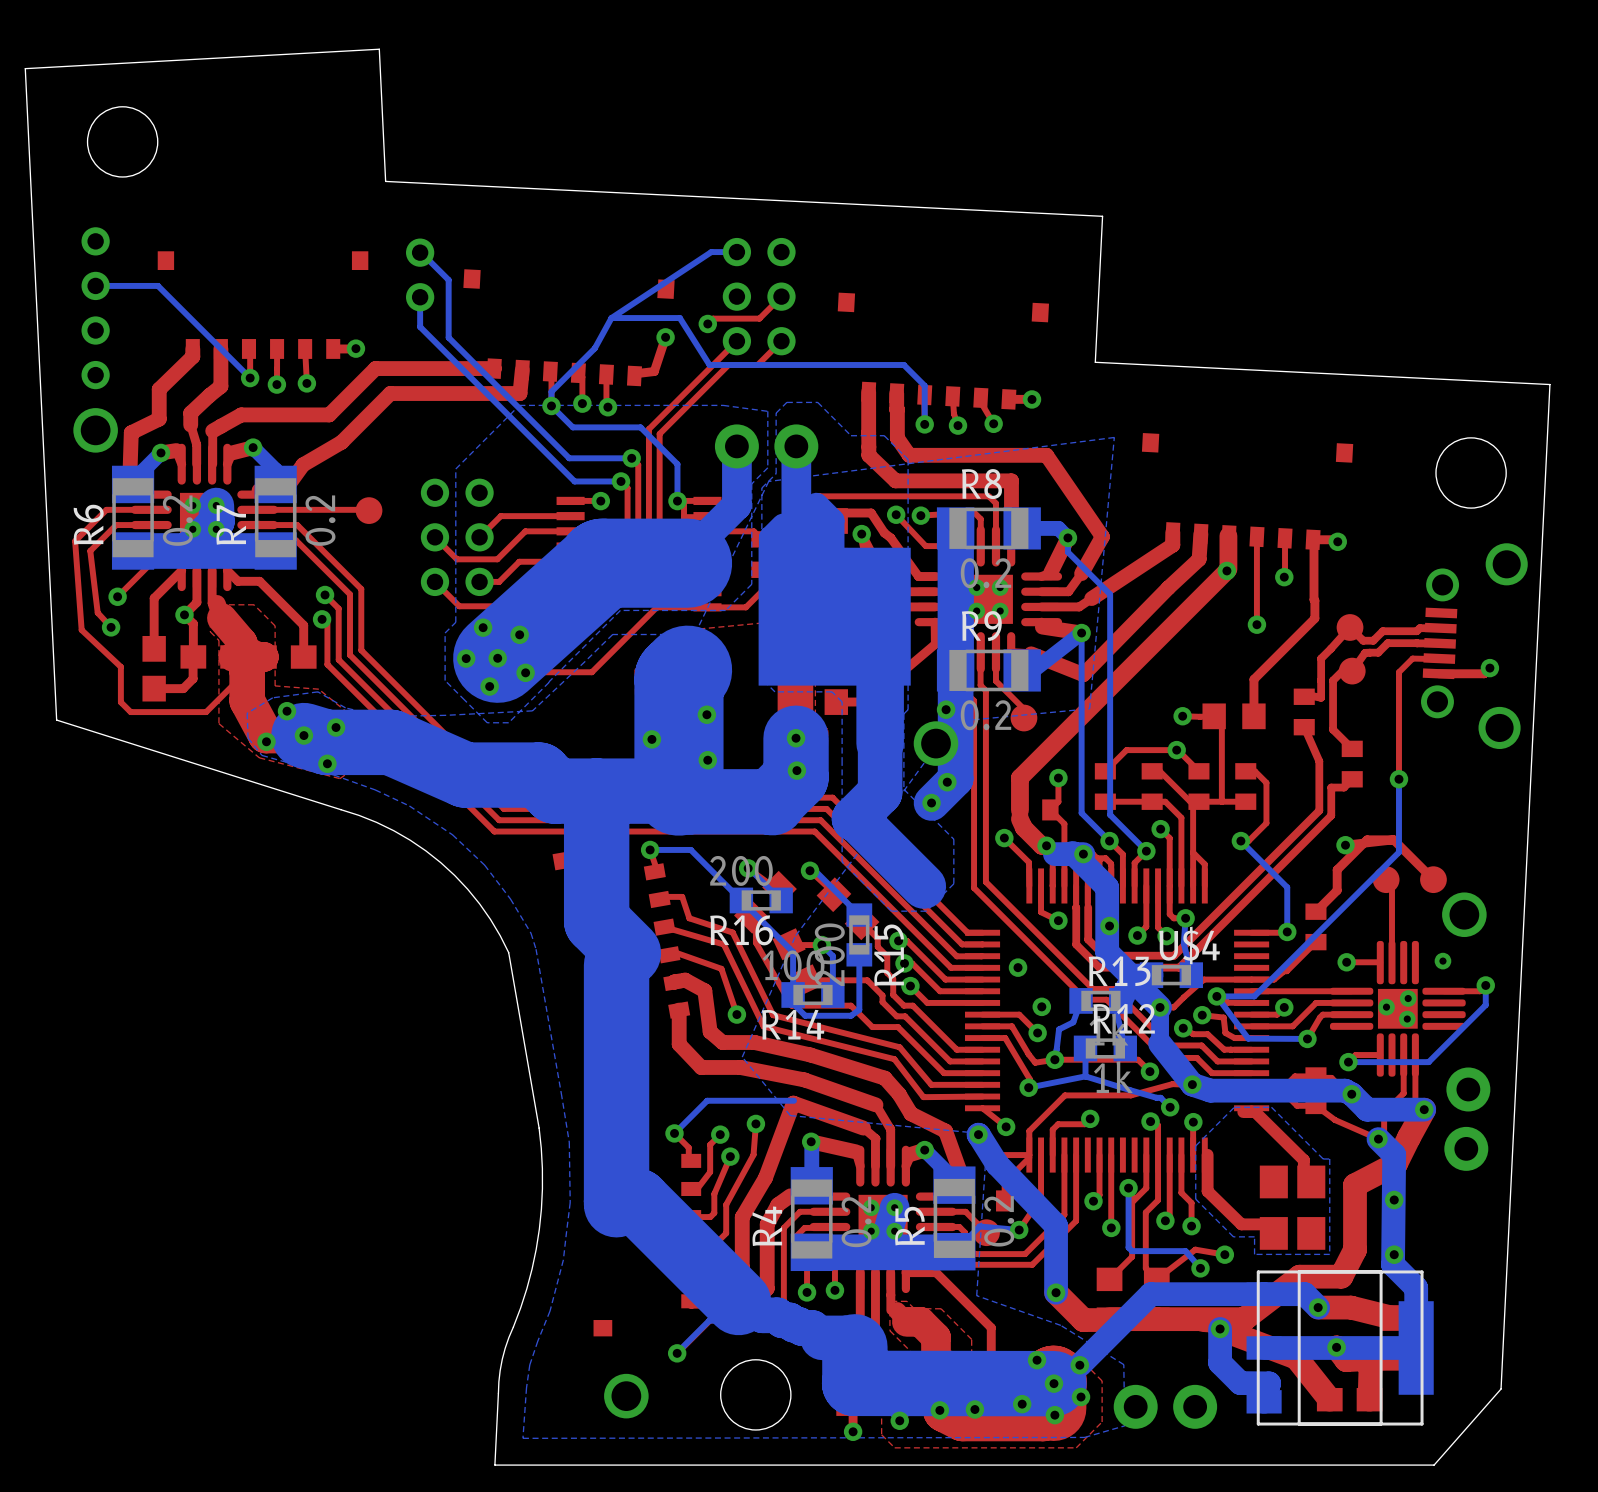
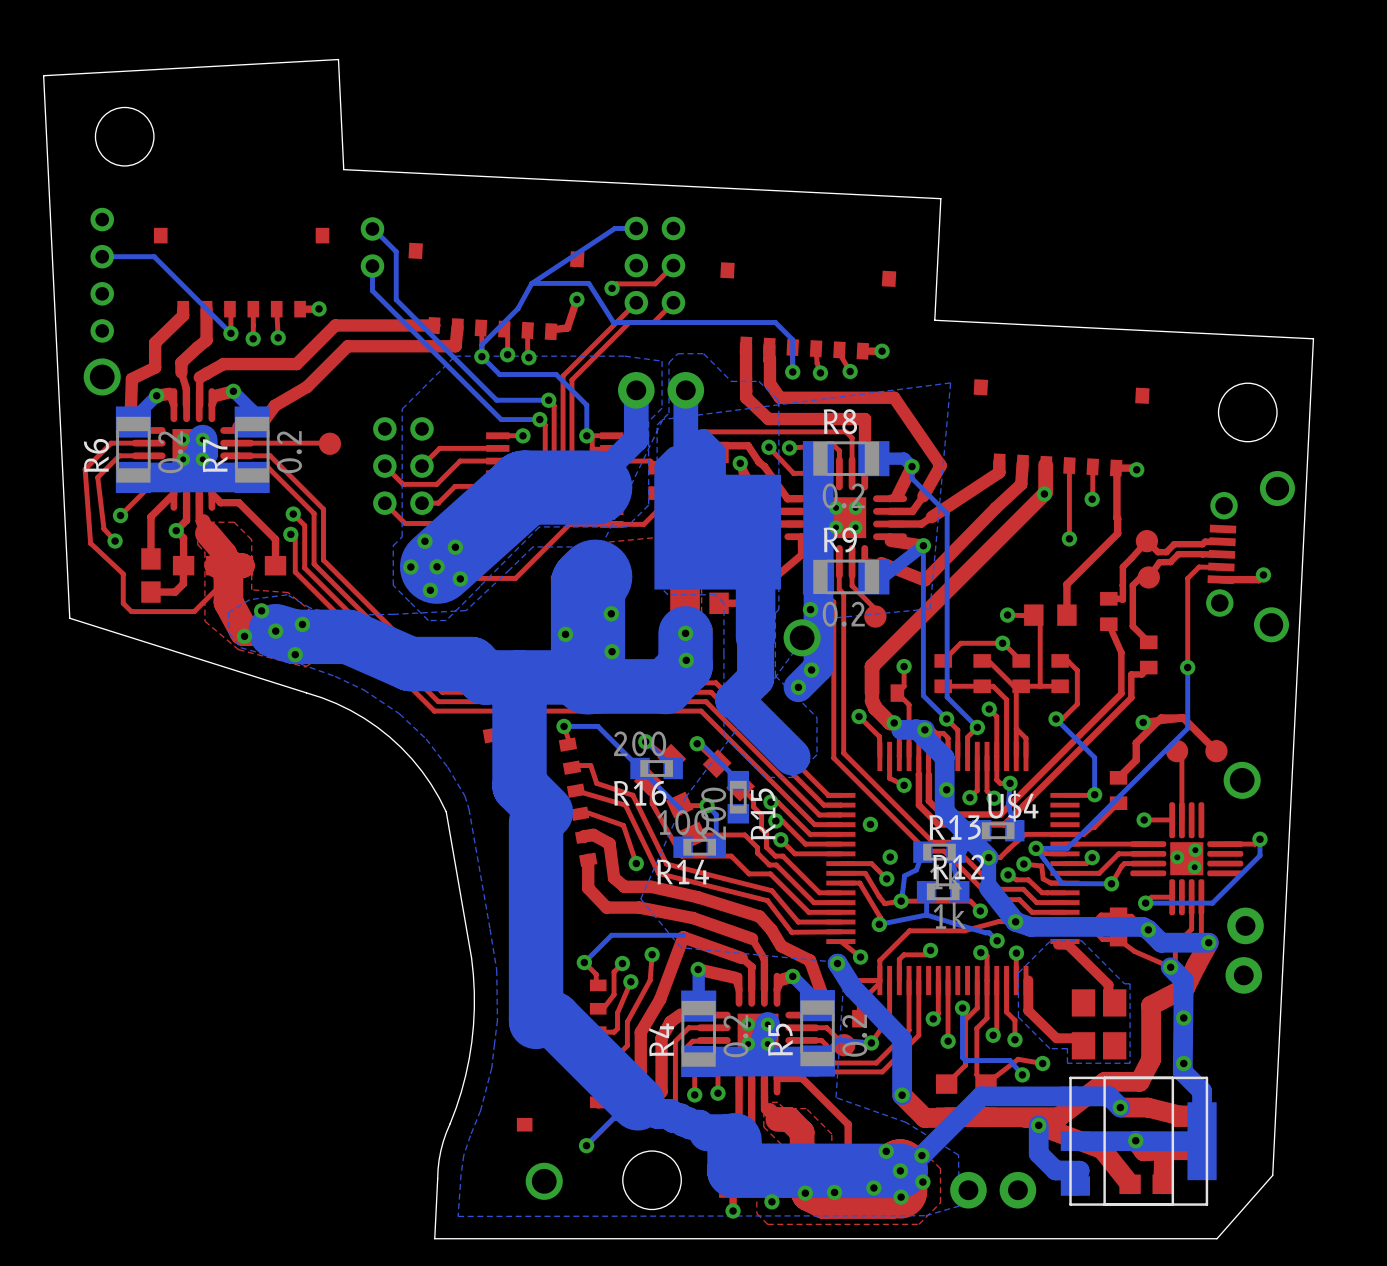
bottom track: (793, 952) (793, 1003) (805, 1015) (851, 1015) (859, 1009) (859, 954) -> none
via: (1442, 961) -> none

